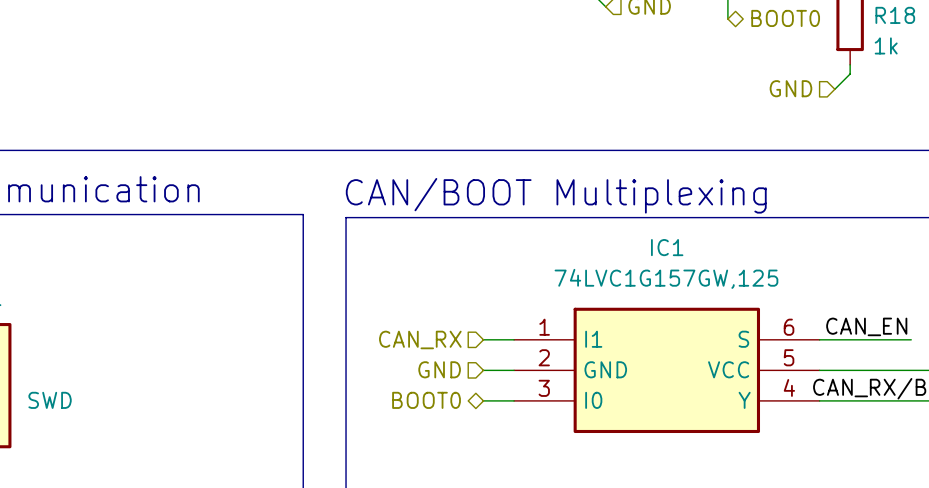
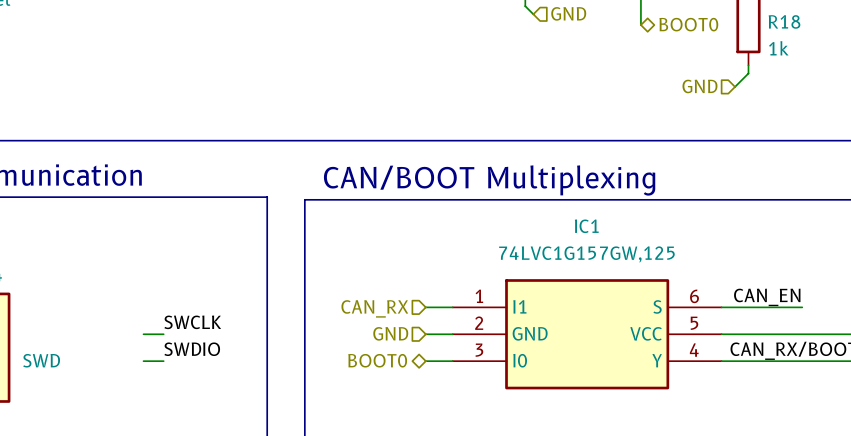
label: none -> SWCLK (192, 322)
wire: none -> (143, 334) (163, 334)
label: none -> SWDIO (192, 349)
wire: none -> (143, 361) (163, 361)

